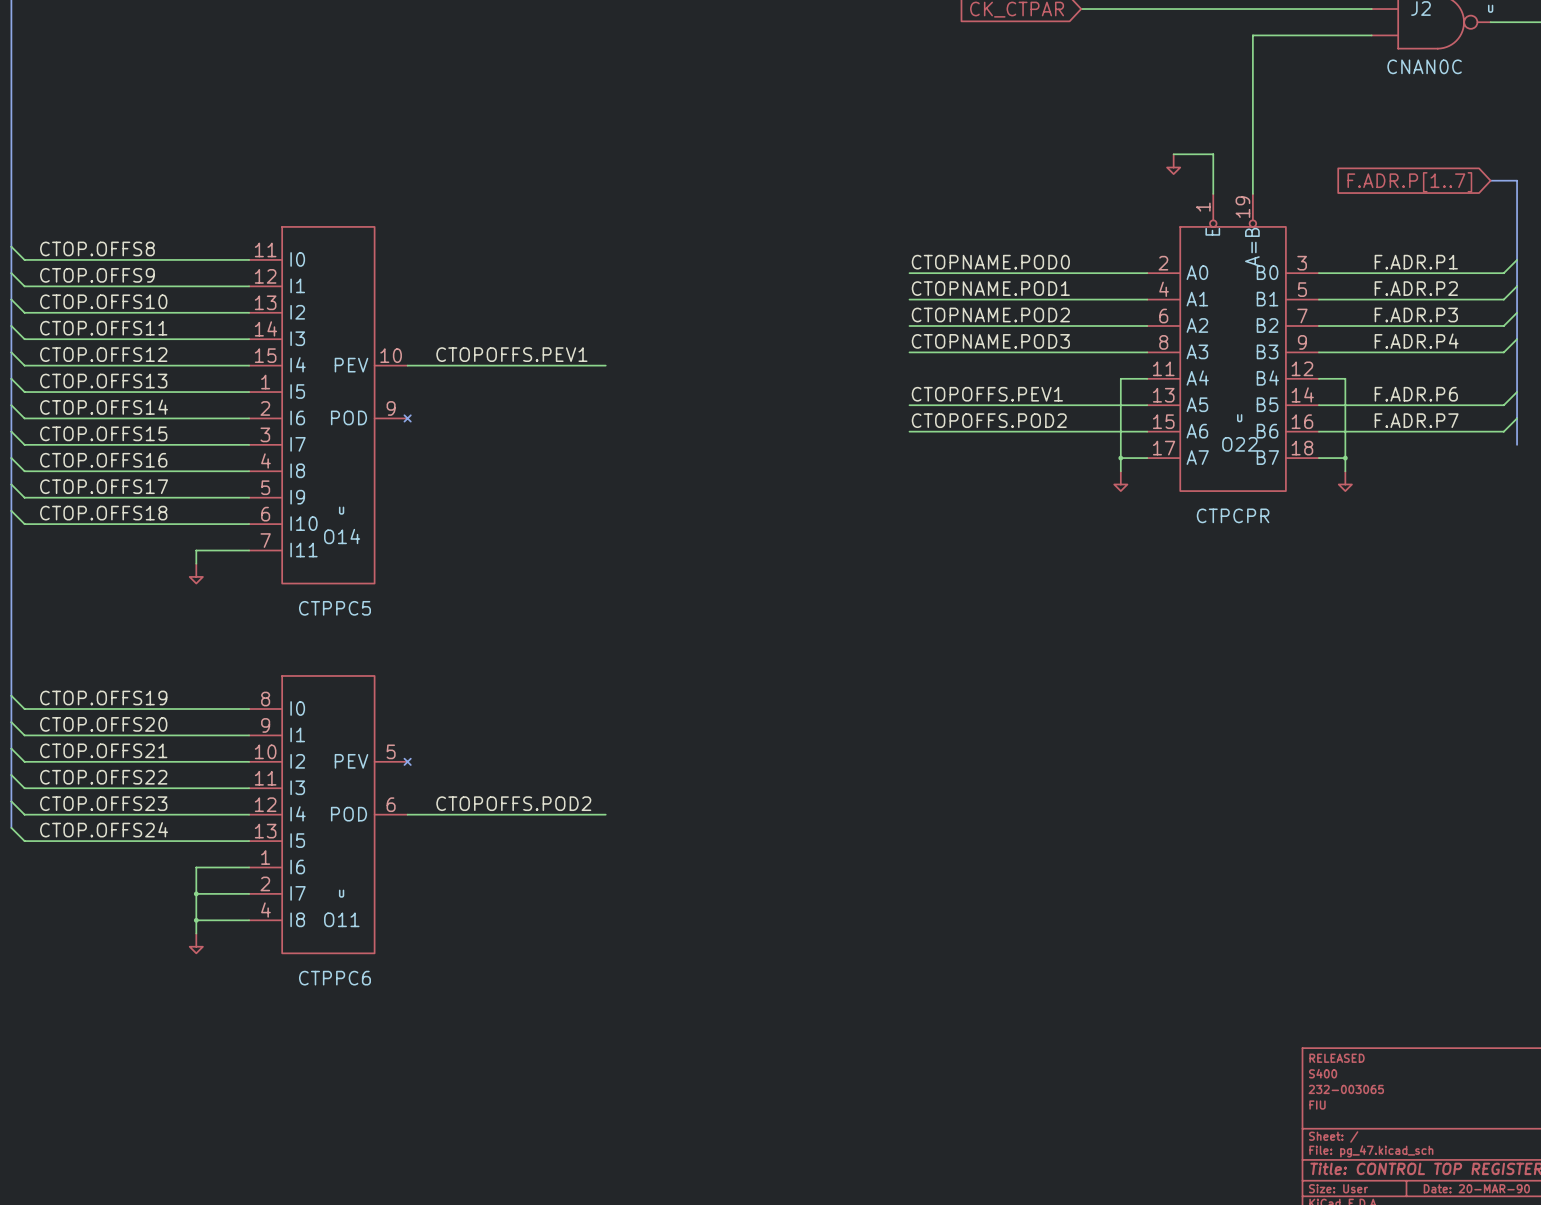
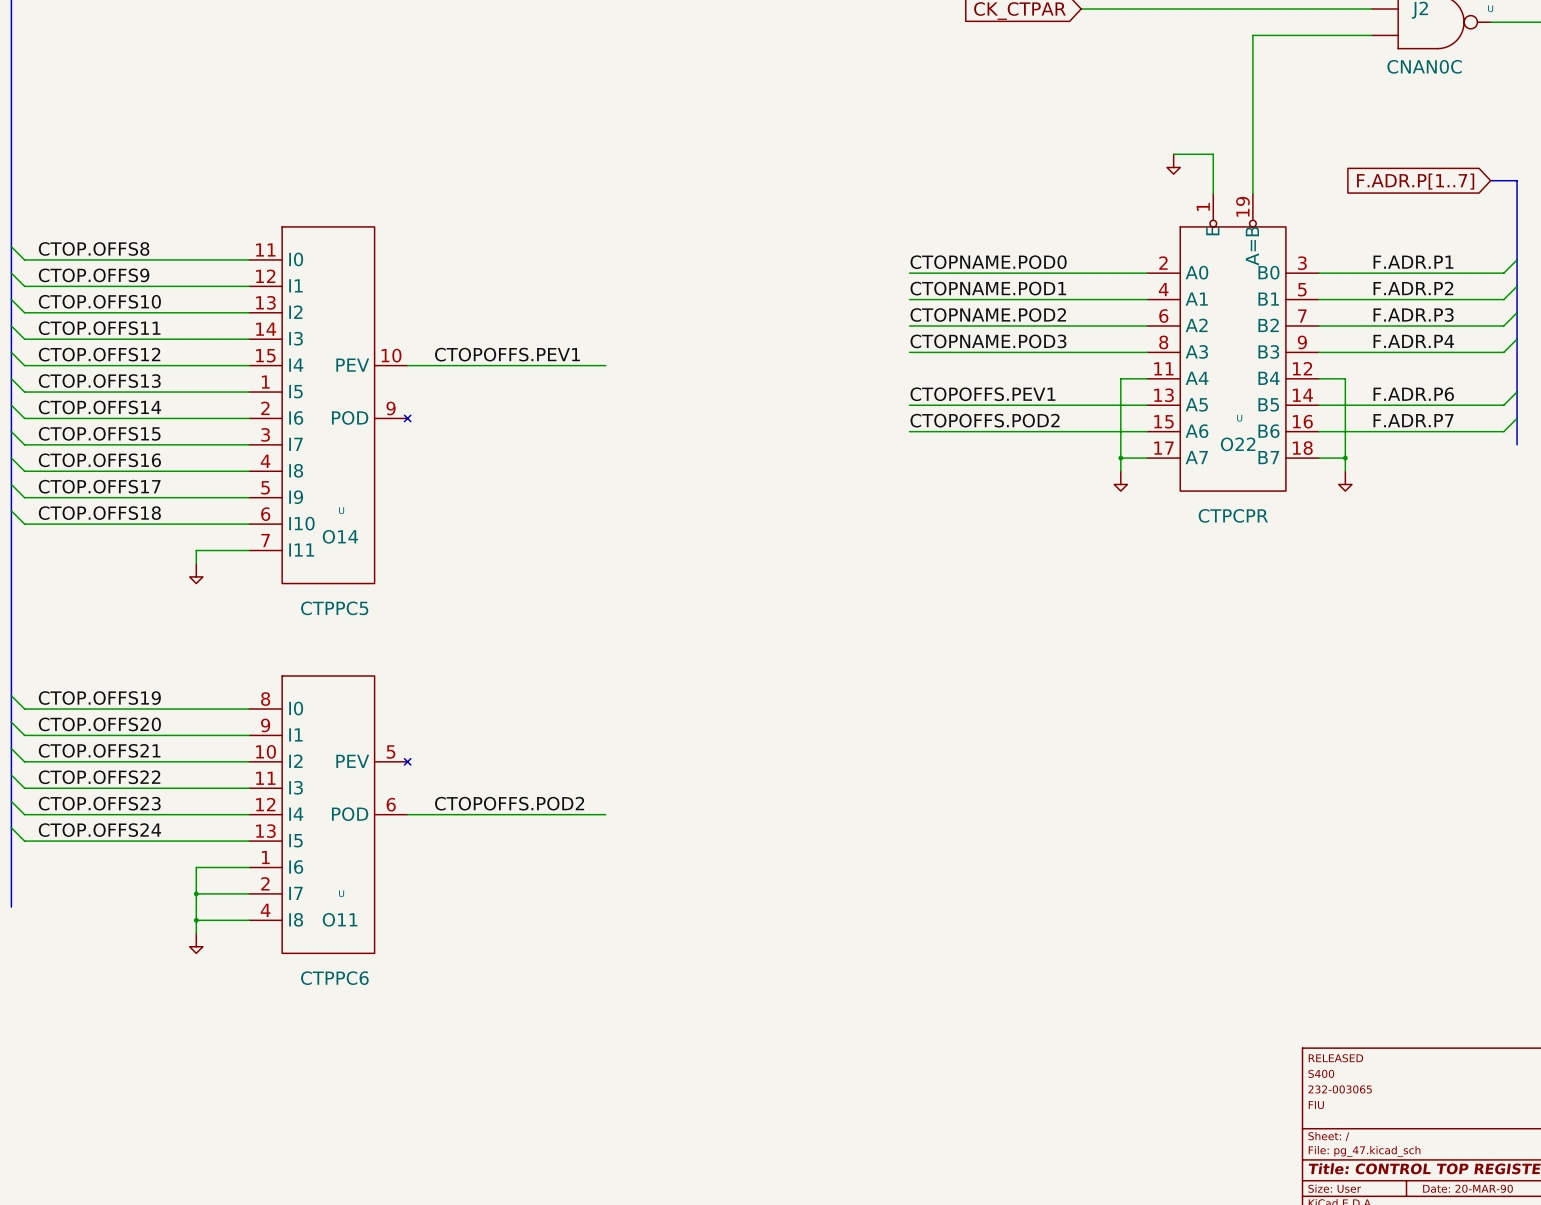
bus: none -> (11, 827) (11, 907)

